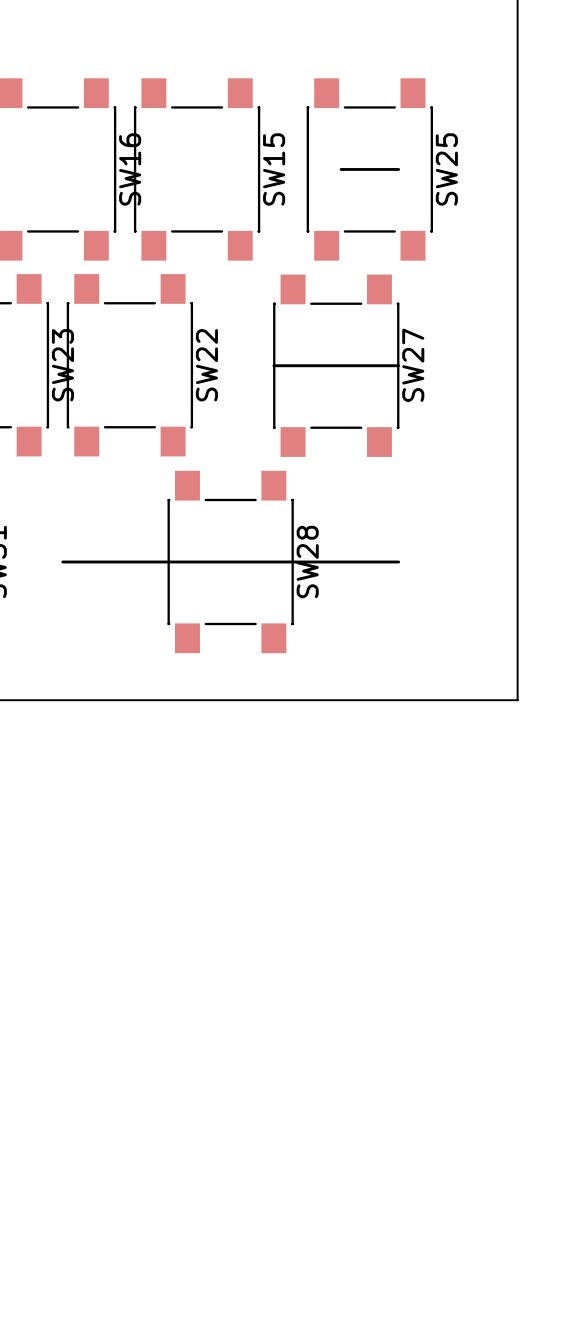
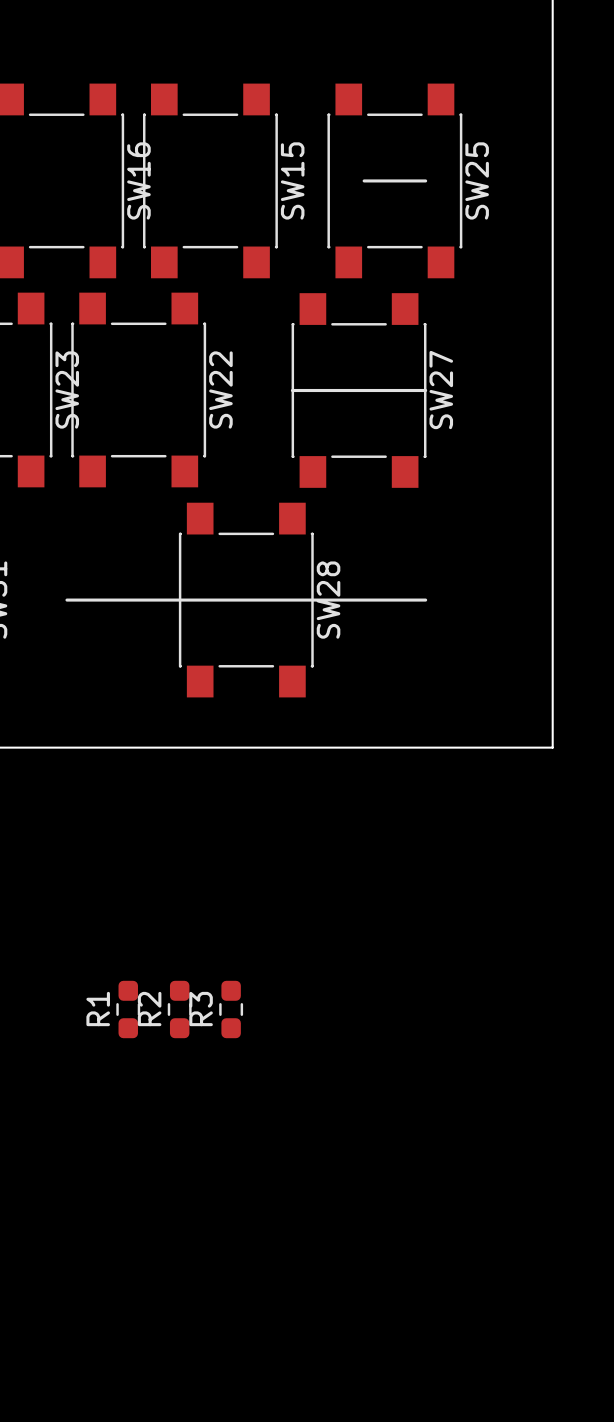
R1: none -> (128, 1009)
R2: none -> (179, 1009)
R3: none -> (231, 1009)

